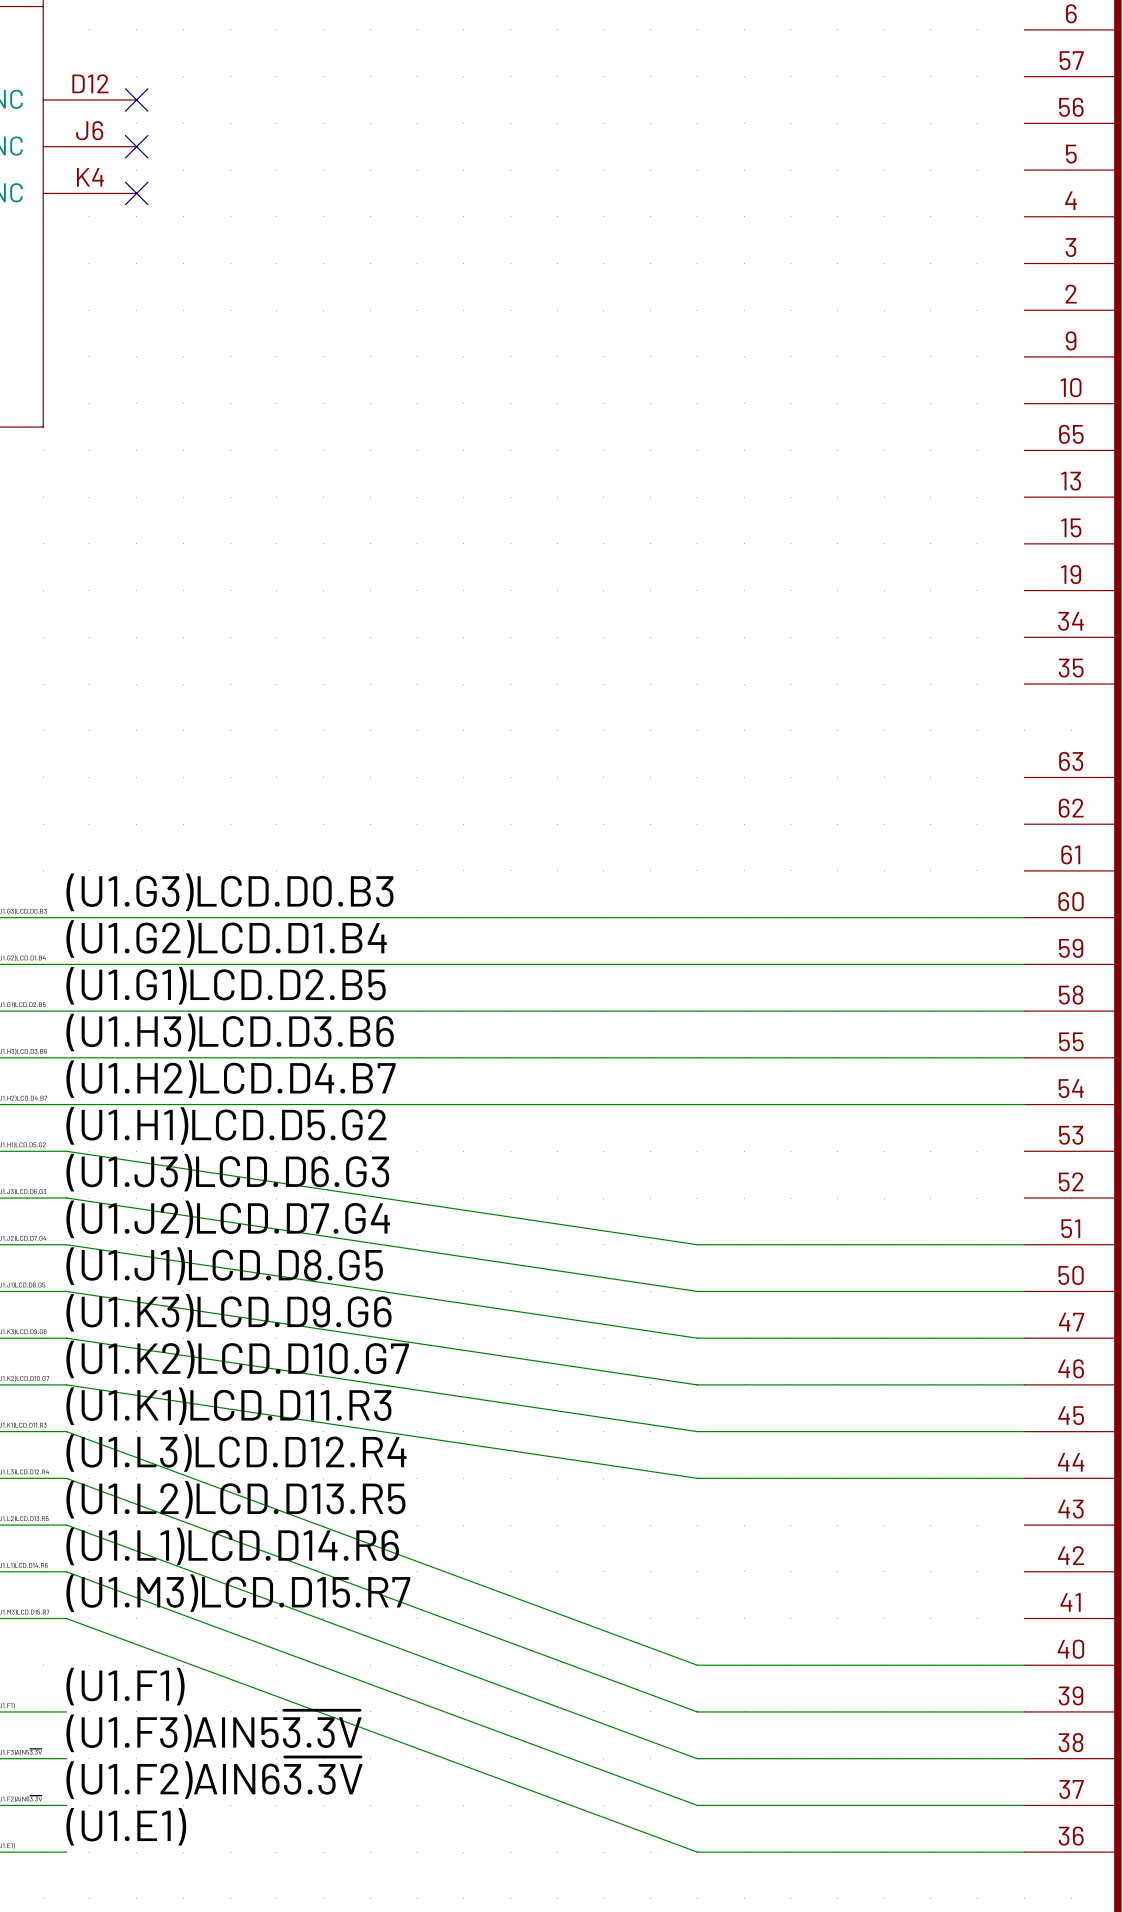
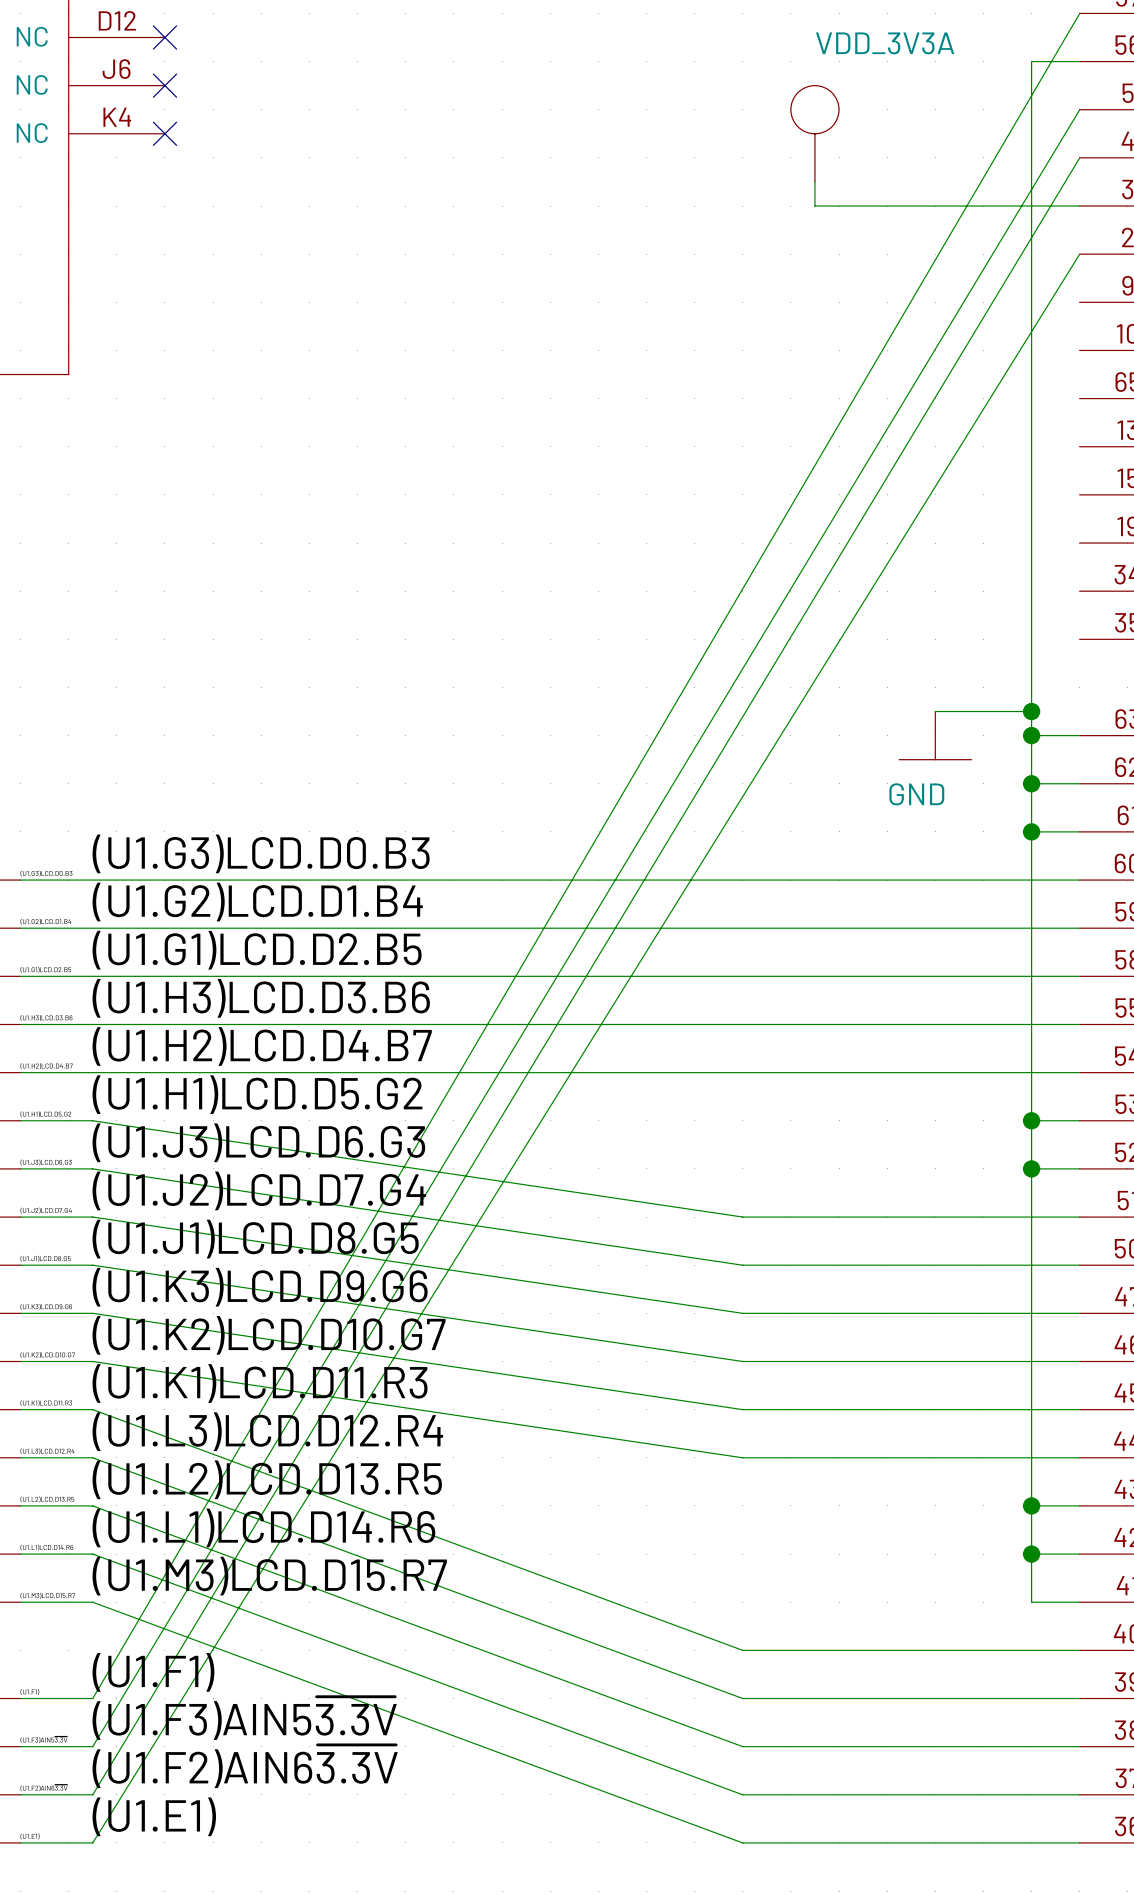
wire: none -> (1079, 13) (92, 1698)
wire: none -> (1079, 61) (1031, 61) (1031, 1602) (1079, 1602)
wire: none -> (1079, 109) (92, 1746)
power symbol: none -> VDD_3V3A (814, 133)
wire: none -> (1079, 157) (92, 1794)
wire: none -> (814, 181) (814, 206) (1079, 206)
wire: none -> (1079, 254) (92, 1842)
wire: none -> (935, 711) (1031, 711)
junction: none -> (1031, 711)
power symbol: none -> GND (935, 735)
wire: none -> (1031, 735) (1079, 735)
junction: none -> (1031, 735)
wire: none -> (1031, 783) (1079, 783)
junction: none -> (1031, 783)
wire: none -> (1031, 831) (1079, 831)
junction: none -> (1031, 831)
wire: none -> (1031, 1120) (1079, 1120)
junction: none -> (1031, 1120)
wire: none -> (1031, 1168) (1079, 1168)
junction: none -> (1031, 1168)
wire: none -> (1031, 1505) (1079, 1505)
junction: none -> (1031, 1505)
wire: none -> (1031, 1554) (1079, 1554)
junction: none -> (1031, 1554)

